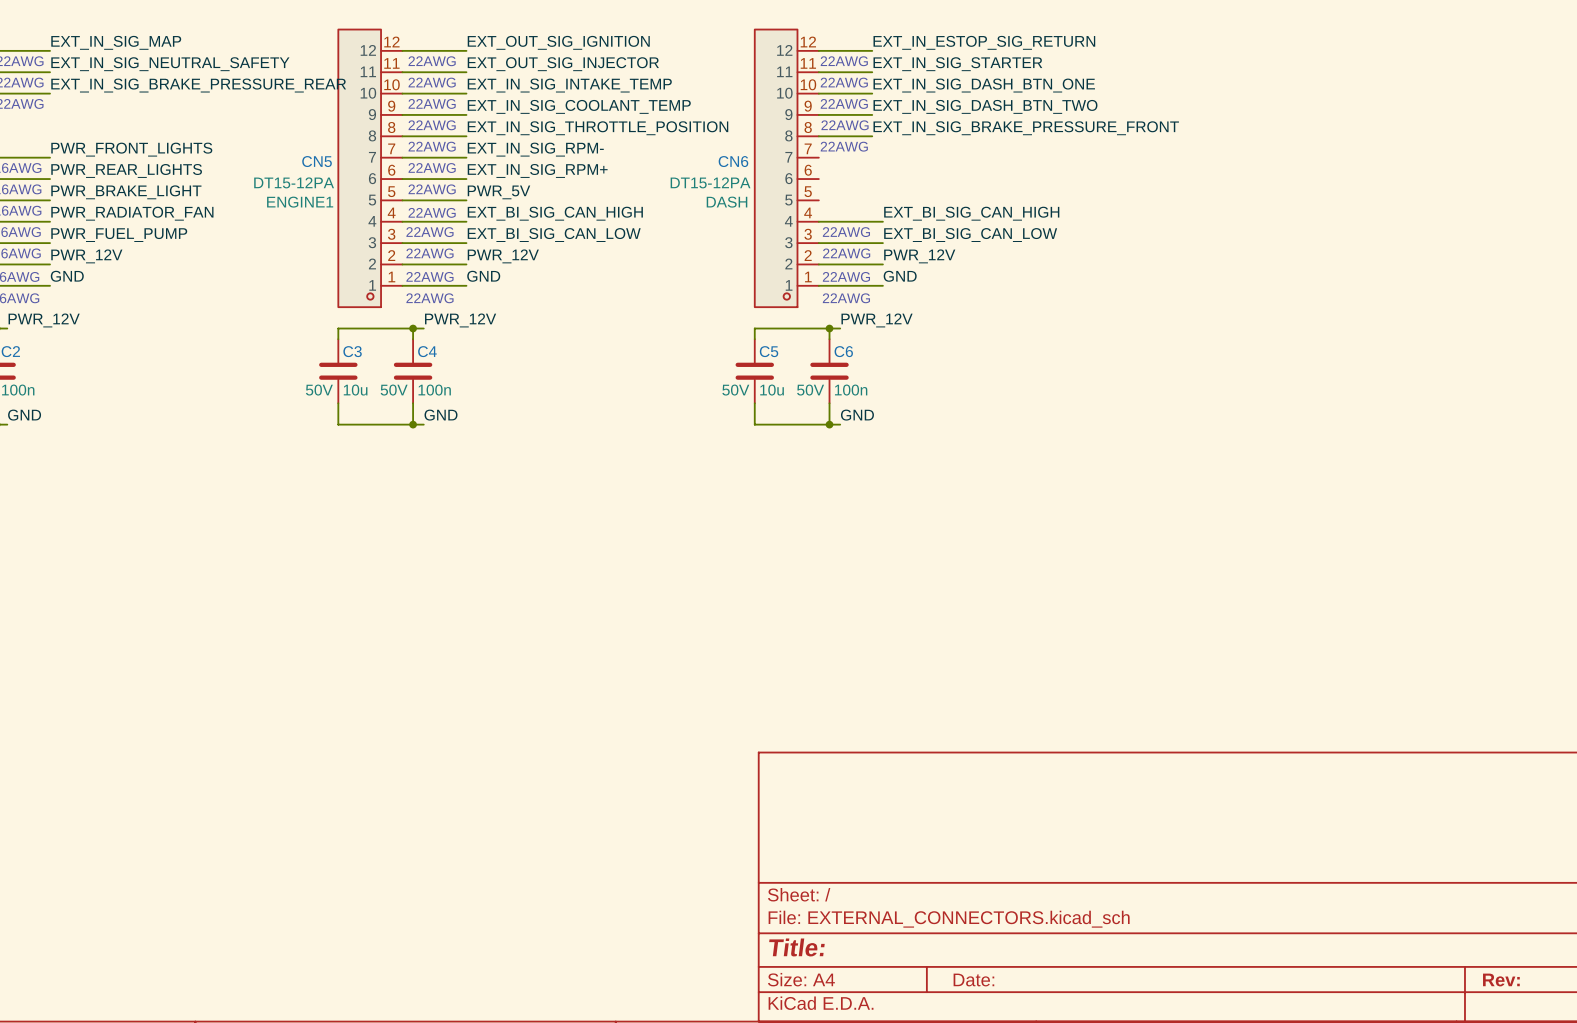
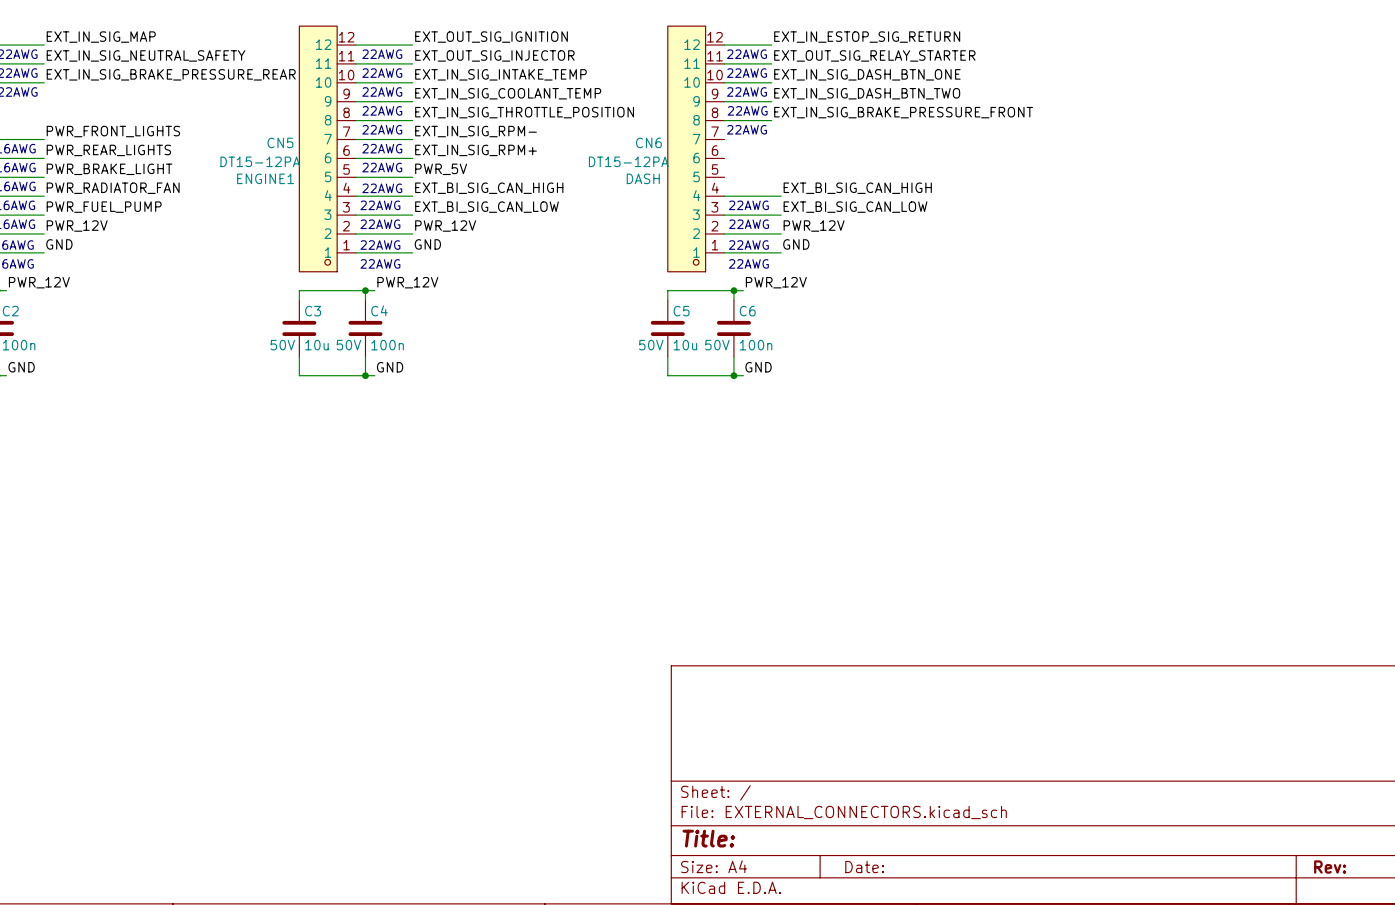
label: EXT_IN_SIG_STARTER (957, 64) -> EXT_OUT_SIG_RELAY_STARTER (874, 55)

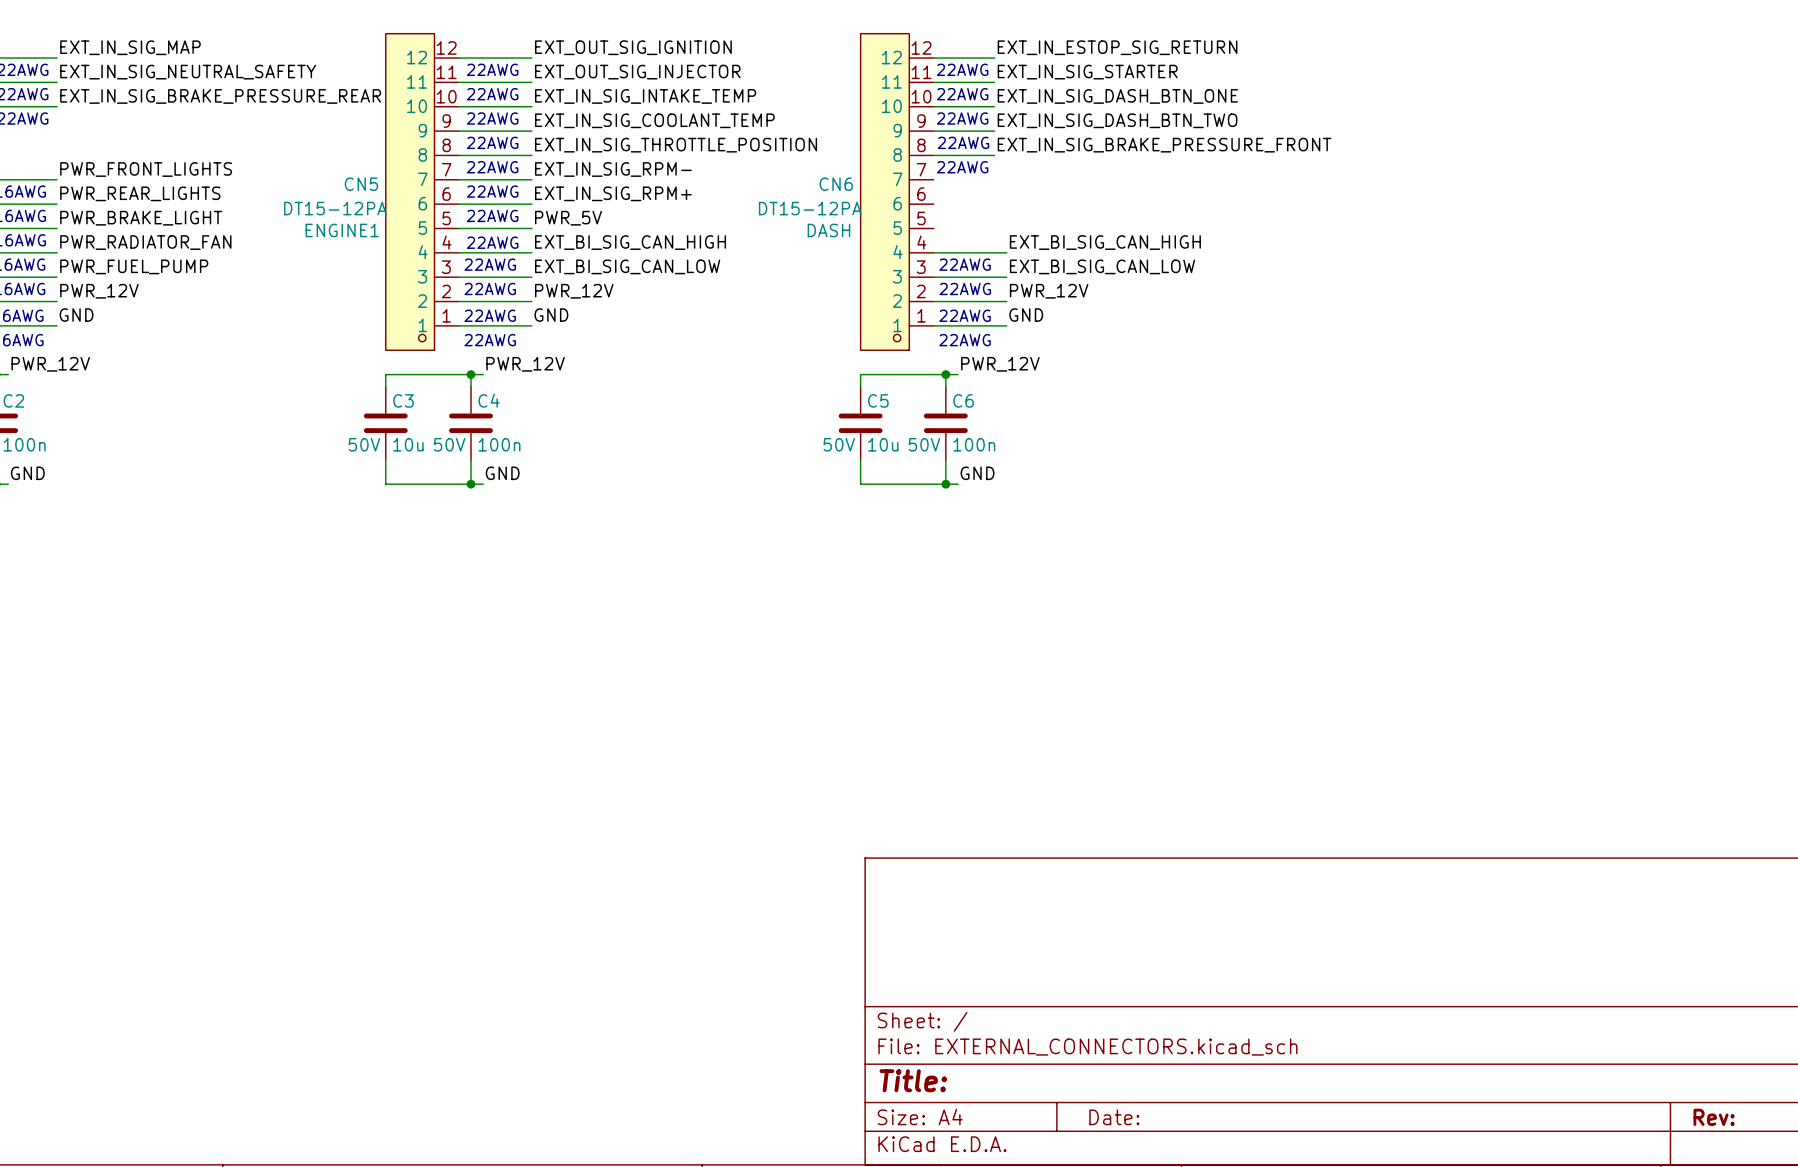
label: EXT_OUT_SIG_RELAY_STARTER (874, 55) -> EXT_IN_SIG_STARTER (1087, 72)

